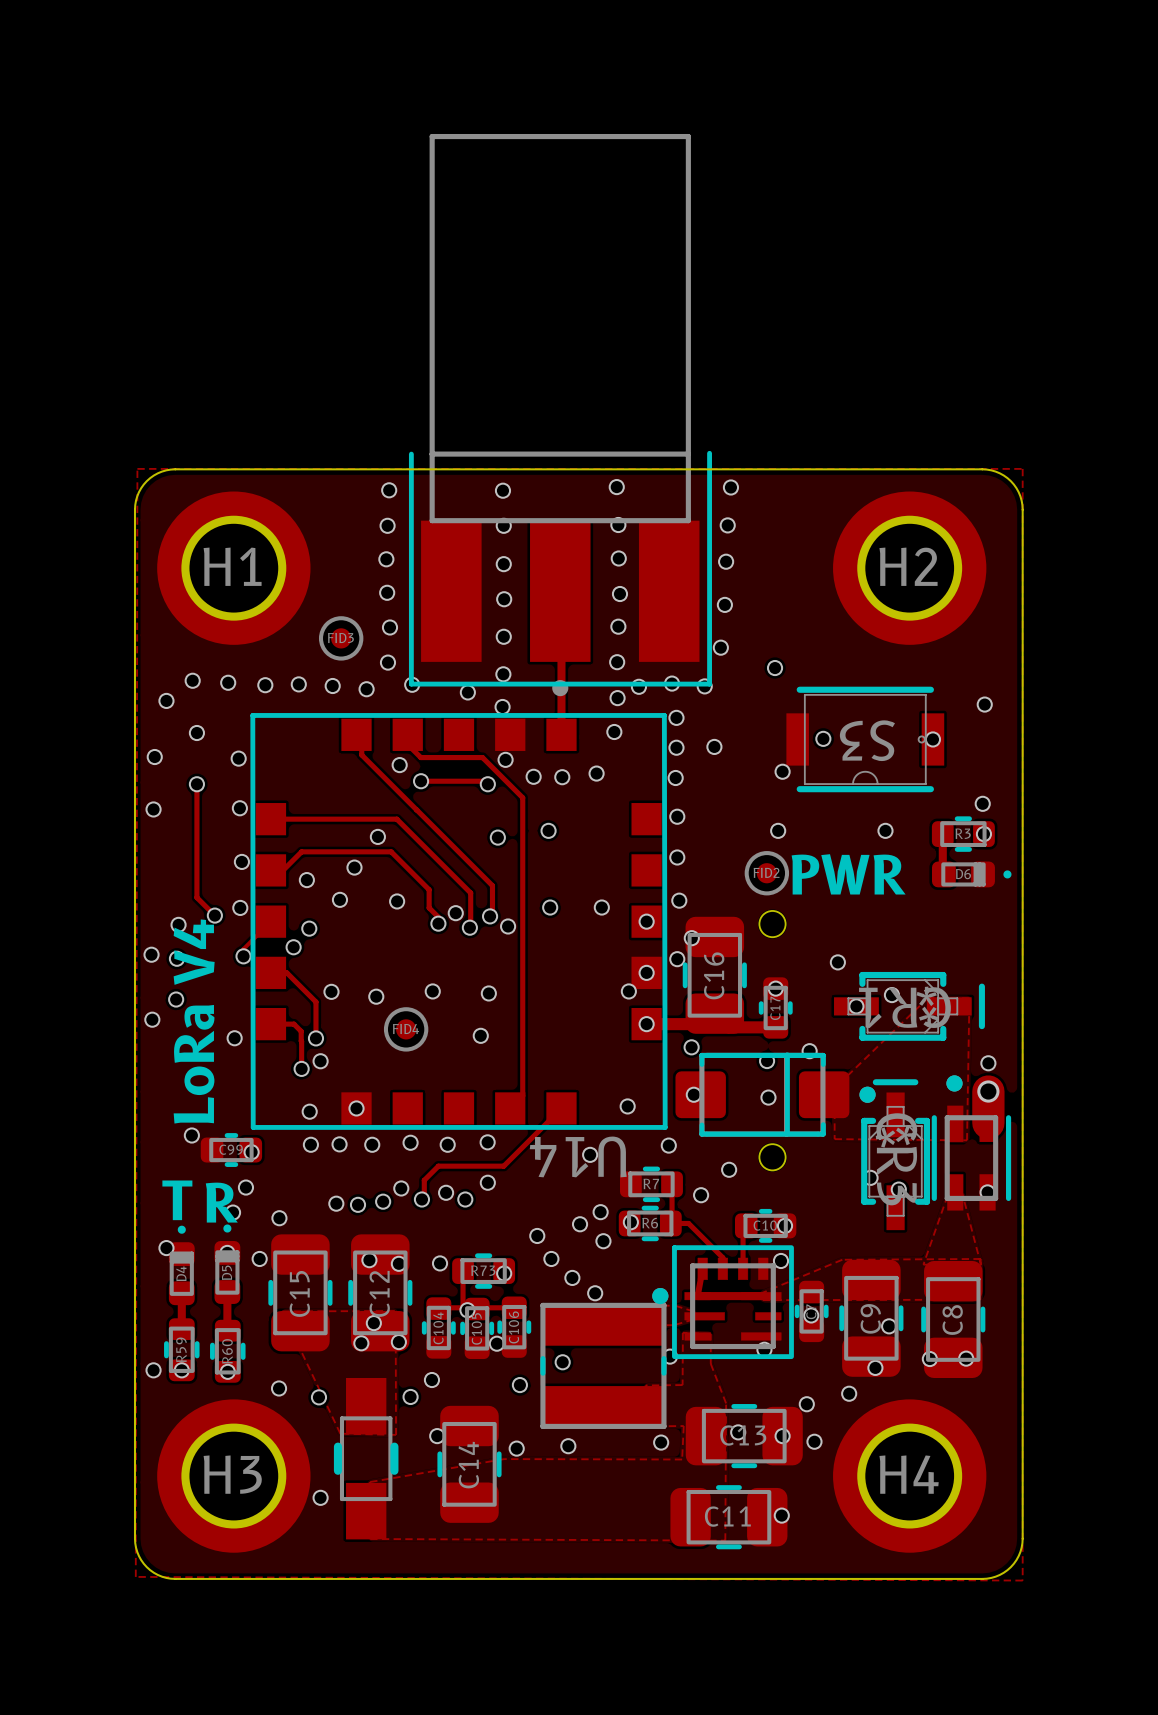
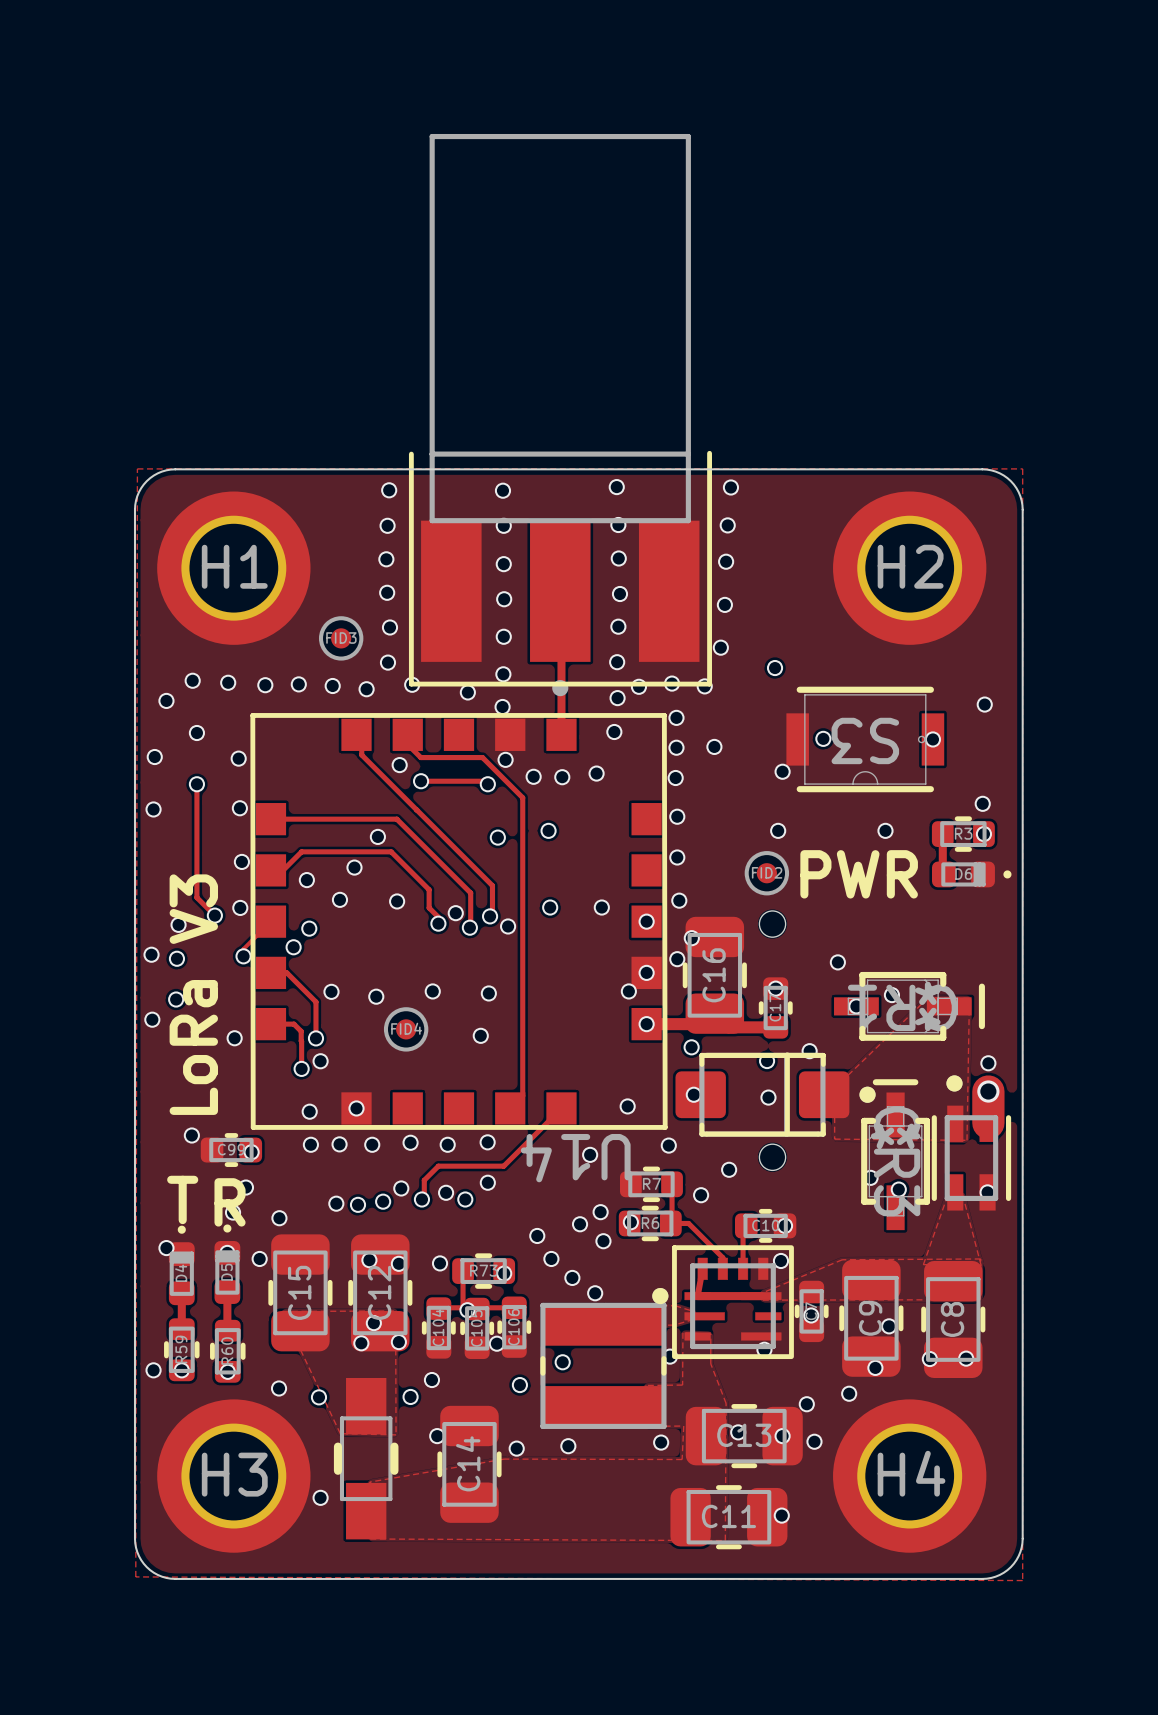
text: LoRa V4 (194, 1021) -> LoRa V3 (193, 994)

